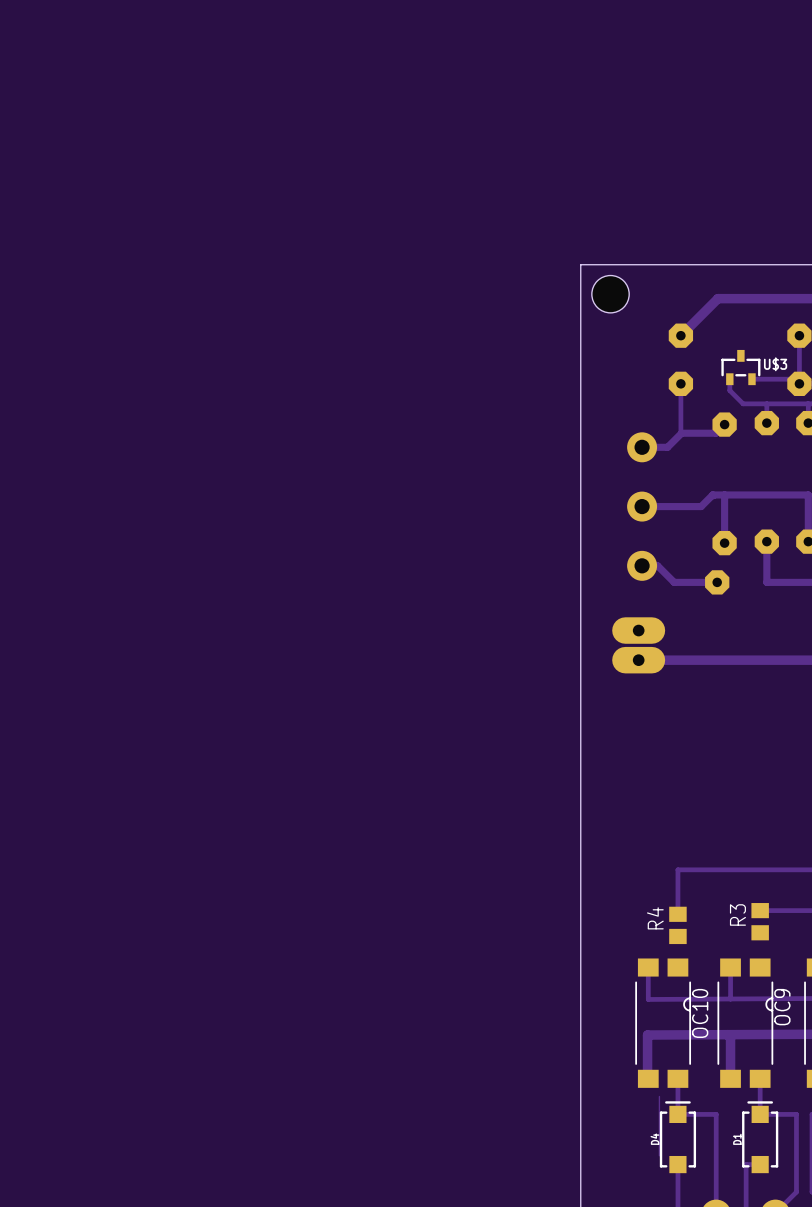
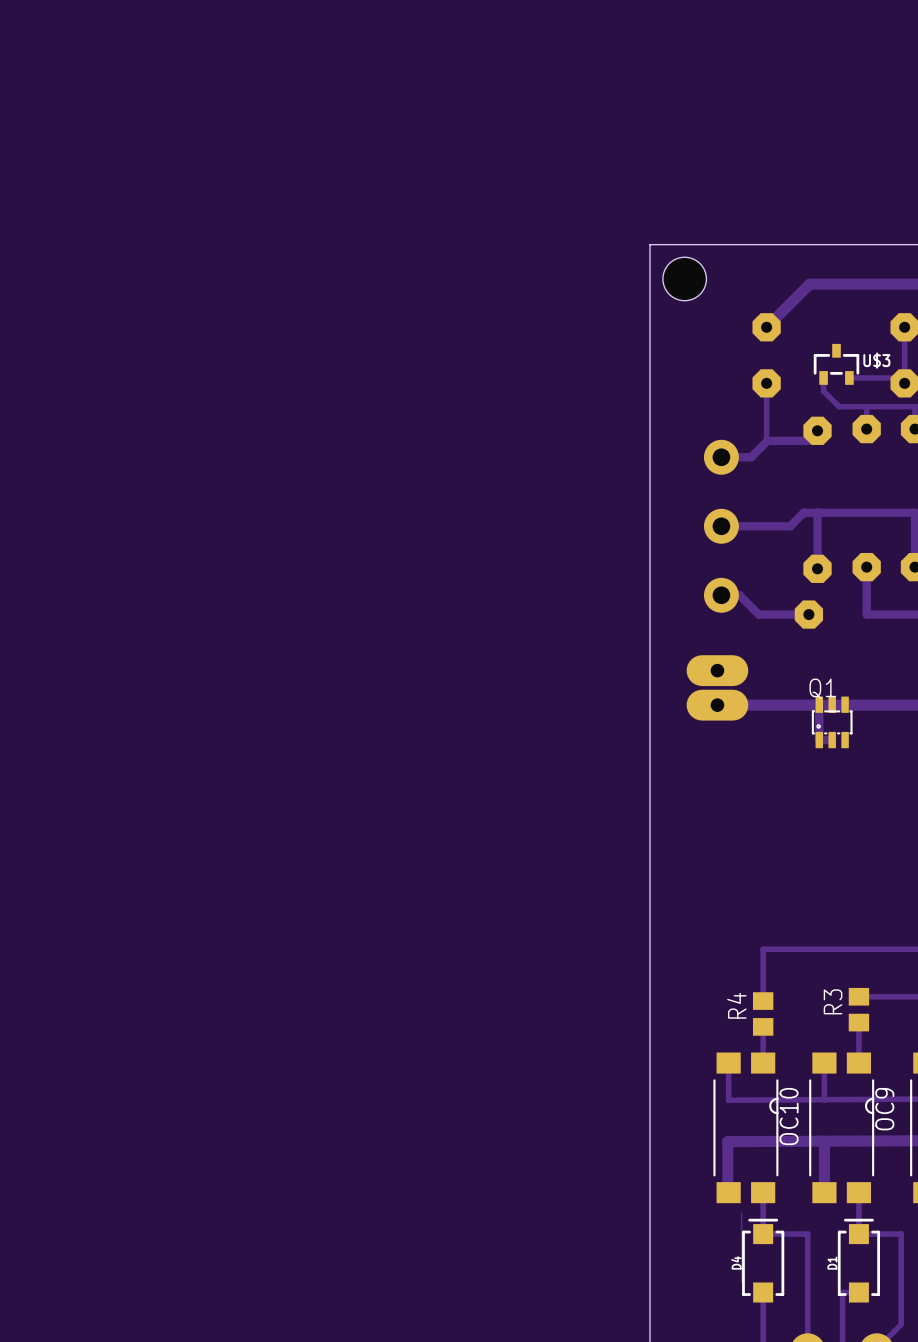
track: none -> (819, 704) (819, 740) (832, 740)
Q1: none -> (832, 722)
track: none -> (858, 1022) (858, 1063)
track: none -> (763, 1026) (763, 1063)

